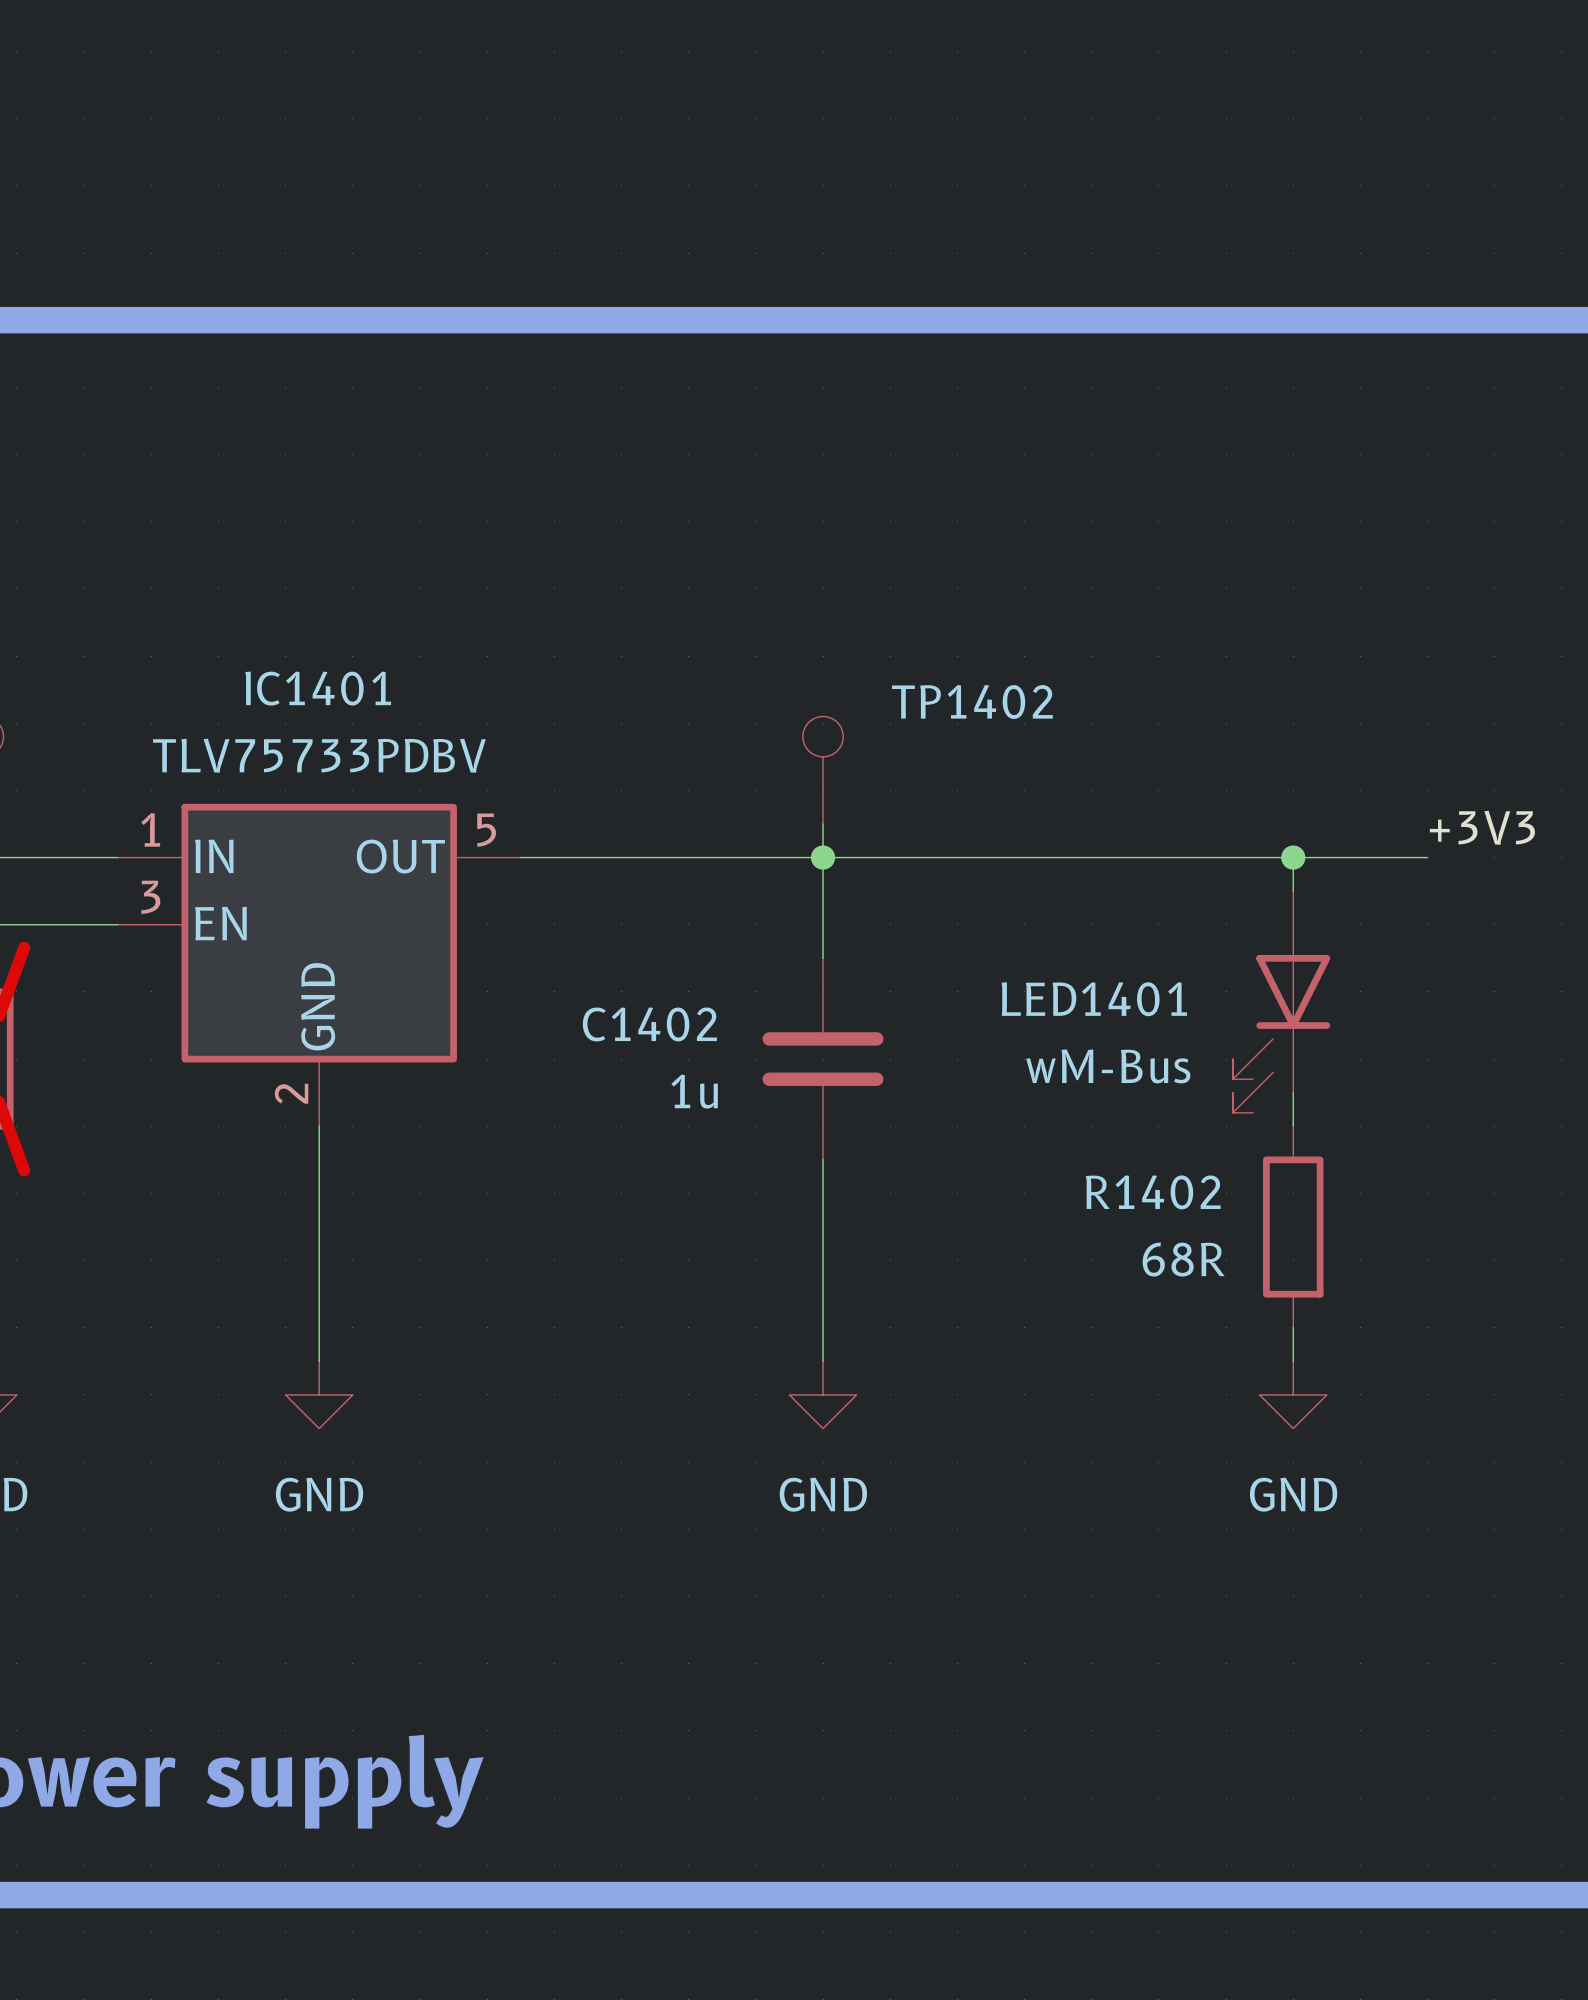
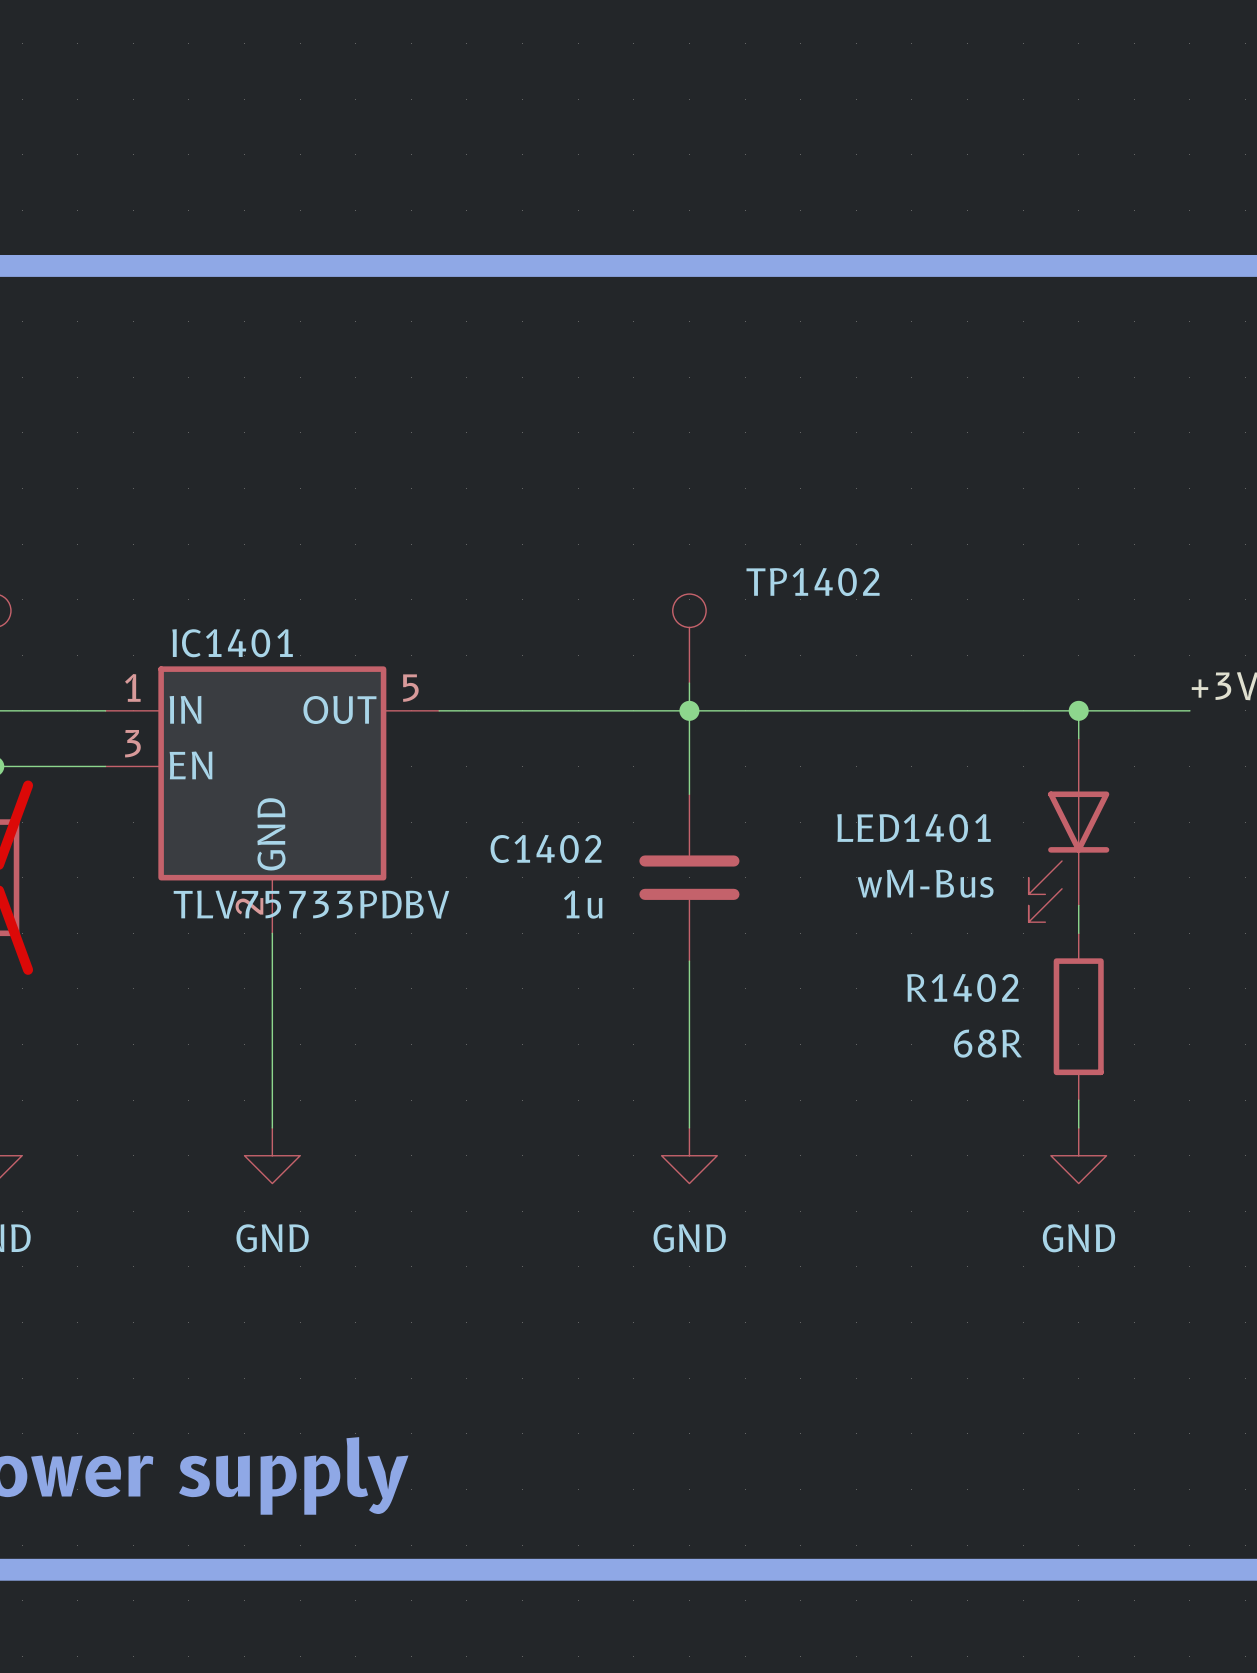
IC1401 name position: IC1401 (318, 688) -> IC1401 (232, 643)
IC1401 value position: TLV75733PDBV (319, 755) -> TLV75733PDBV (311, 904)

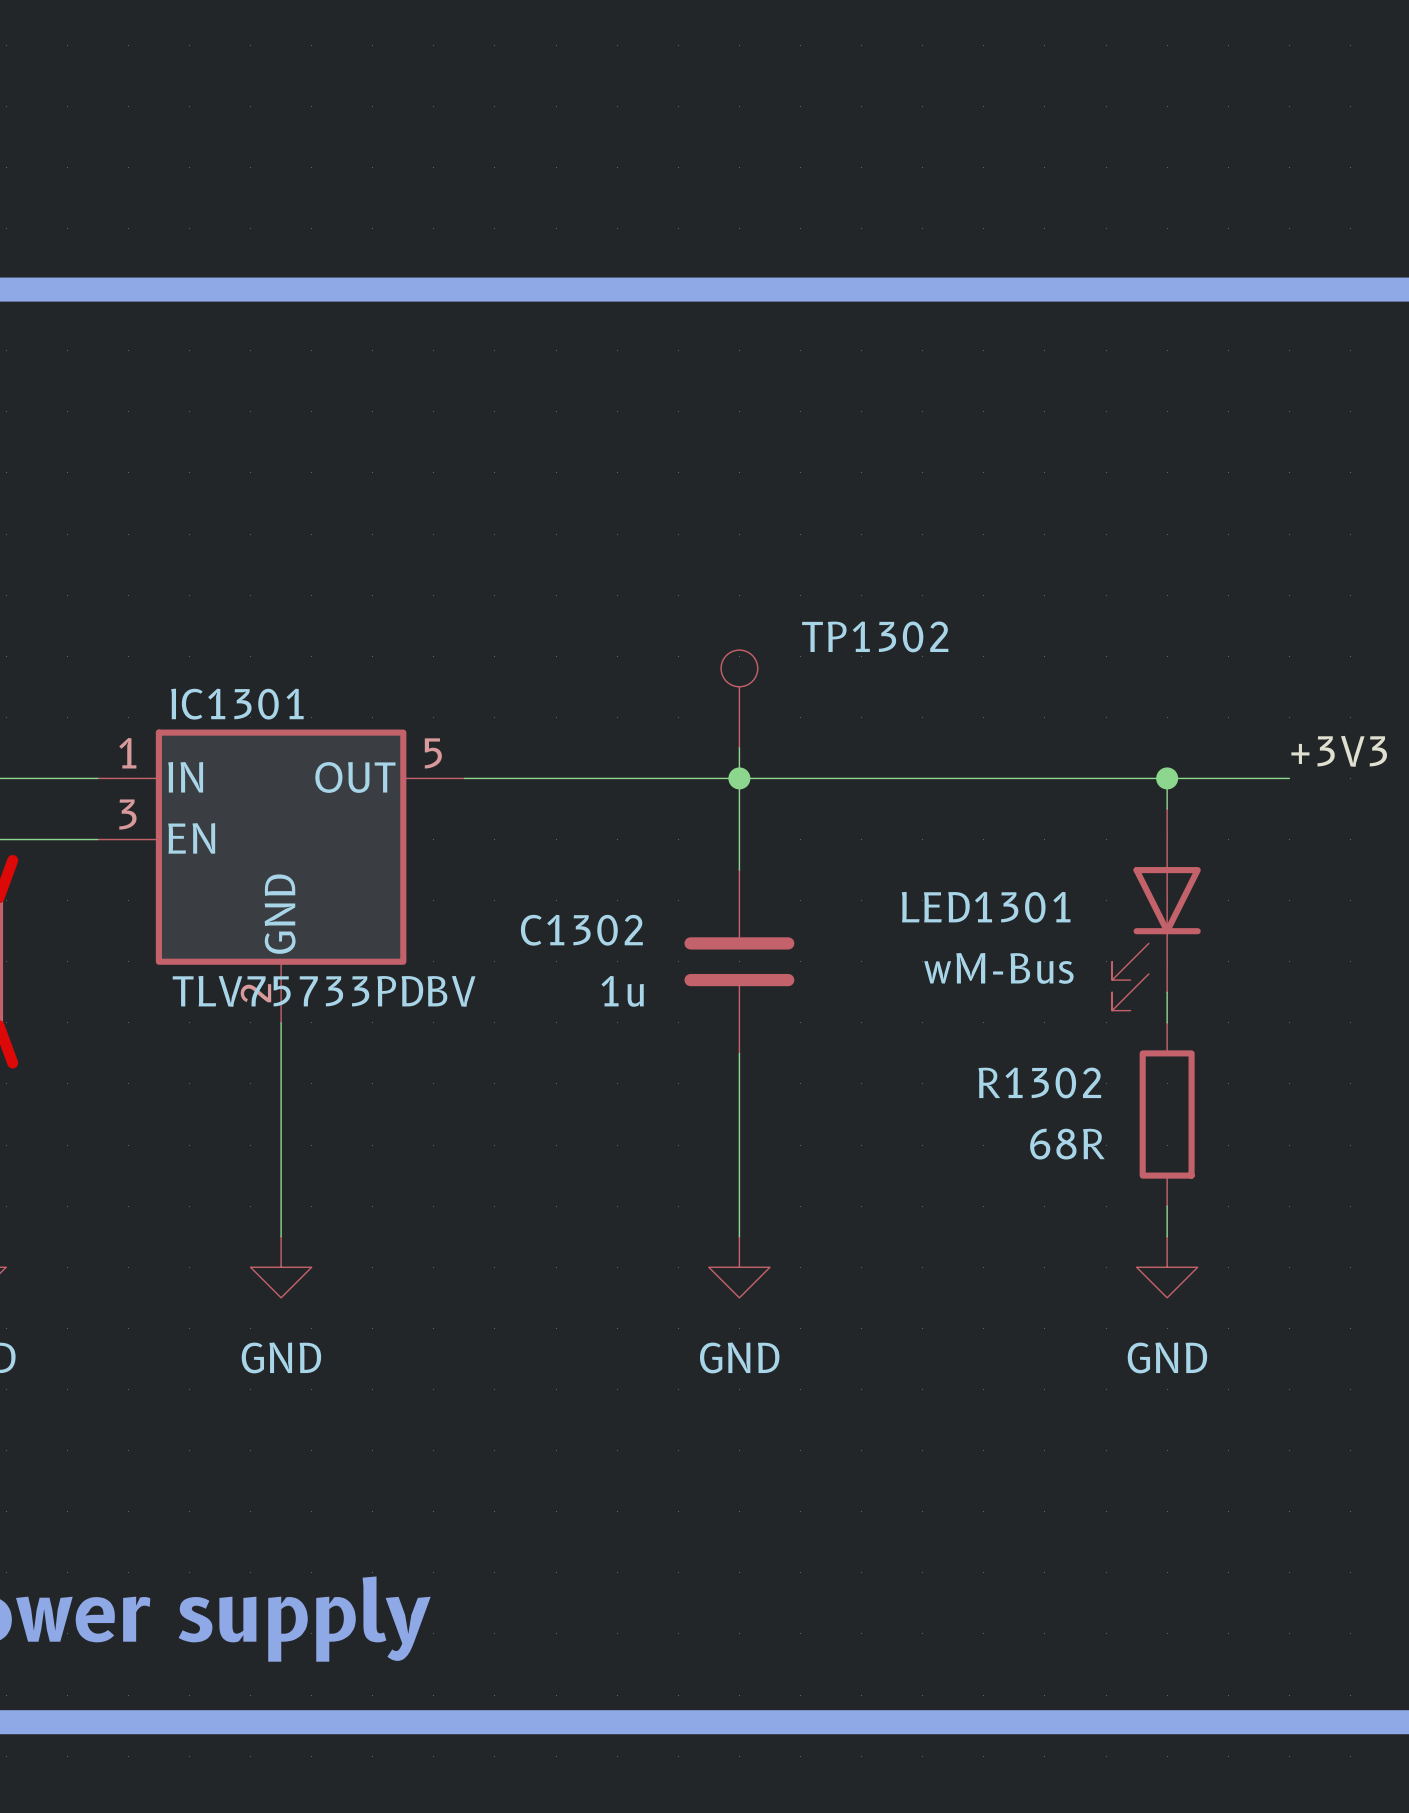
TP1402 name: TP1402 (813, 582) -> TP1302 (875, 636)
IC1401 name: IC1401 (232, 643) -> IC1301 (237, 704)
LED1401 name: LED1401 (913, 828) -> LED1301 (986, 907)
C1402 name: C1402 (546, 848) -> C1302 (581, 930)
R1402 name: R1402 (962, 988) -> R1302 (1039, 1082)

